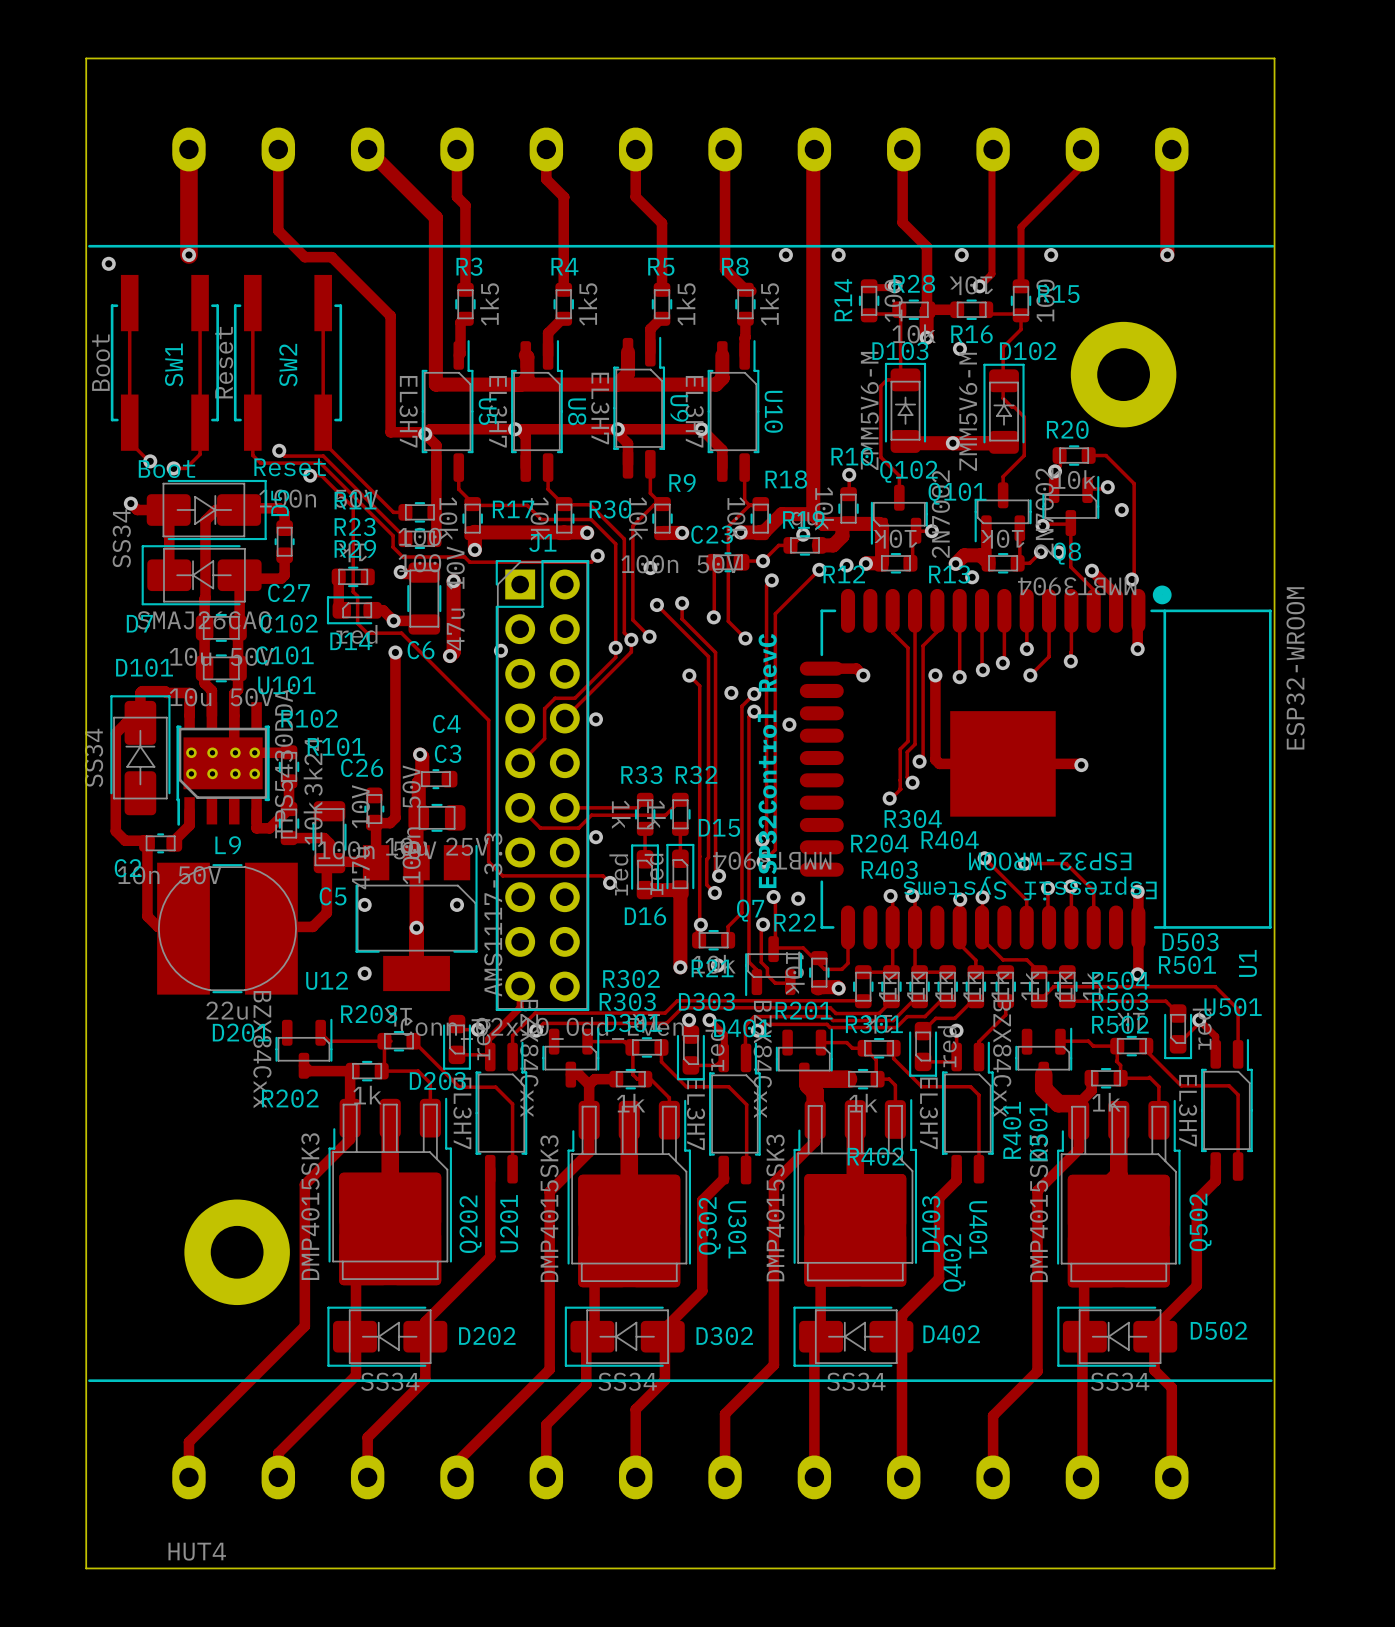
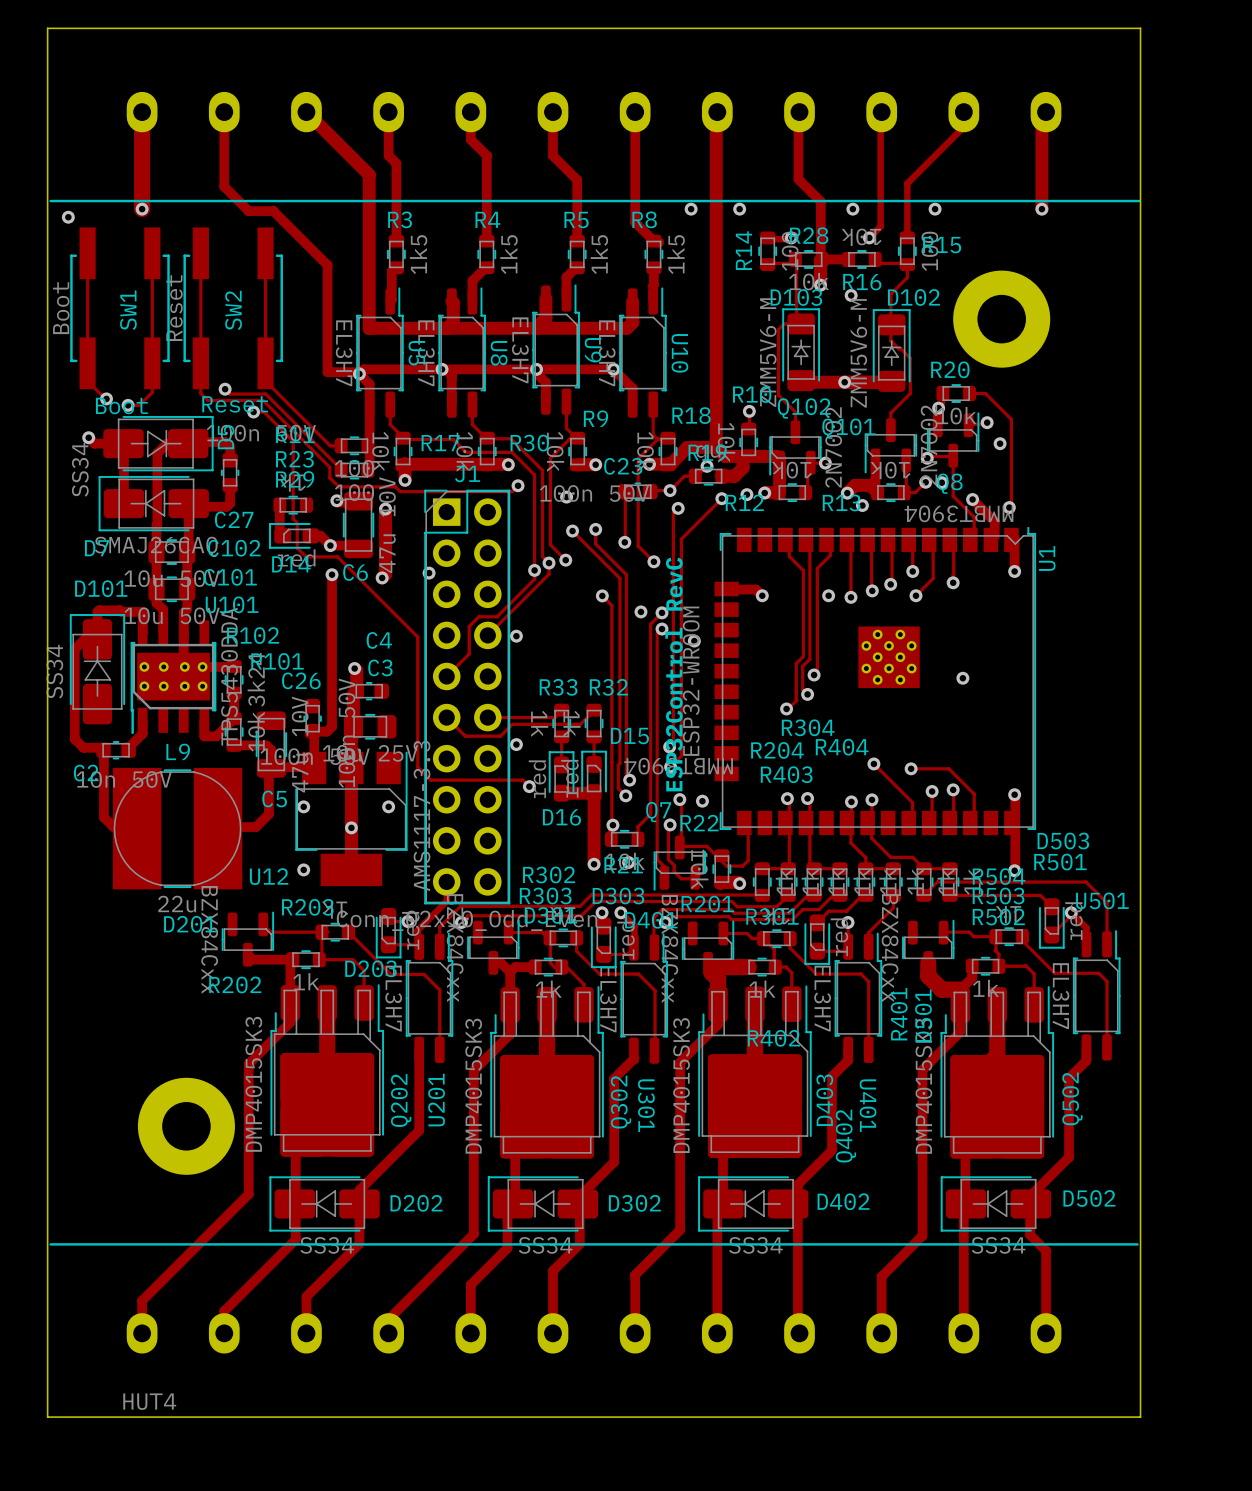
U1 footprint: [799, 585, 1272, 950] -> [714, 526, 1037, 836]
U1 value position: ESP32-WROOM (1295, 668) -> ESP32-WROOM (691, 681)
track: (935, 675) (935, 759) (939, 763) (1081, 765) -> none
U1 name position: U1 (1247, 963) -> U1 (1047, 558)

